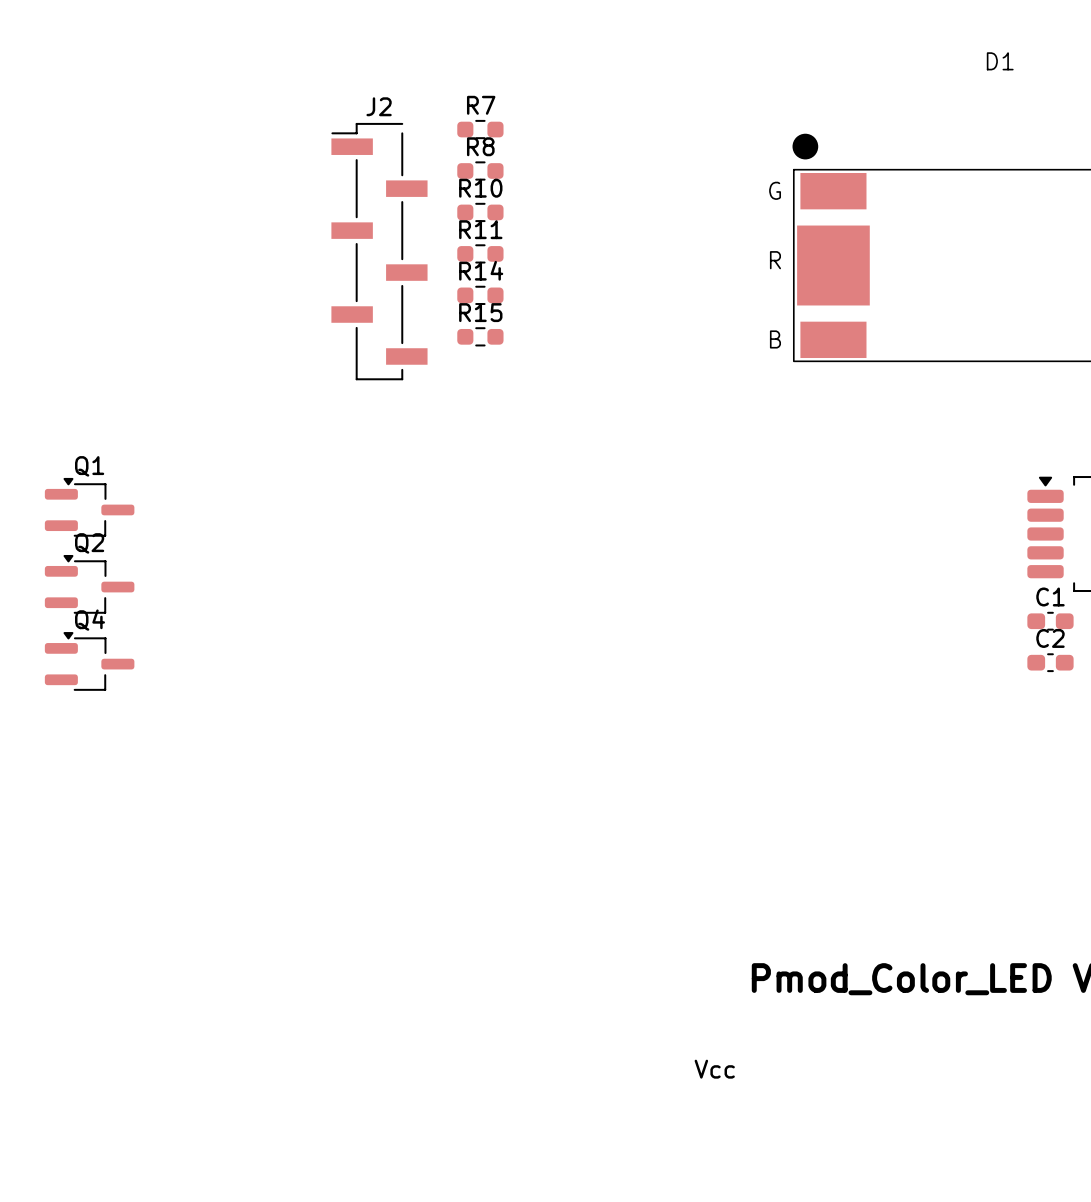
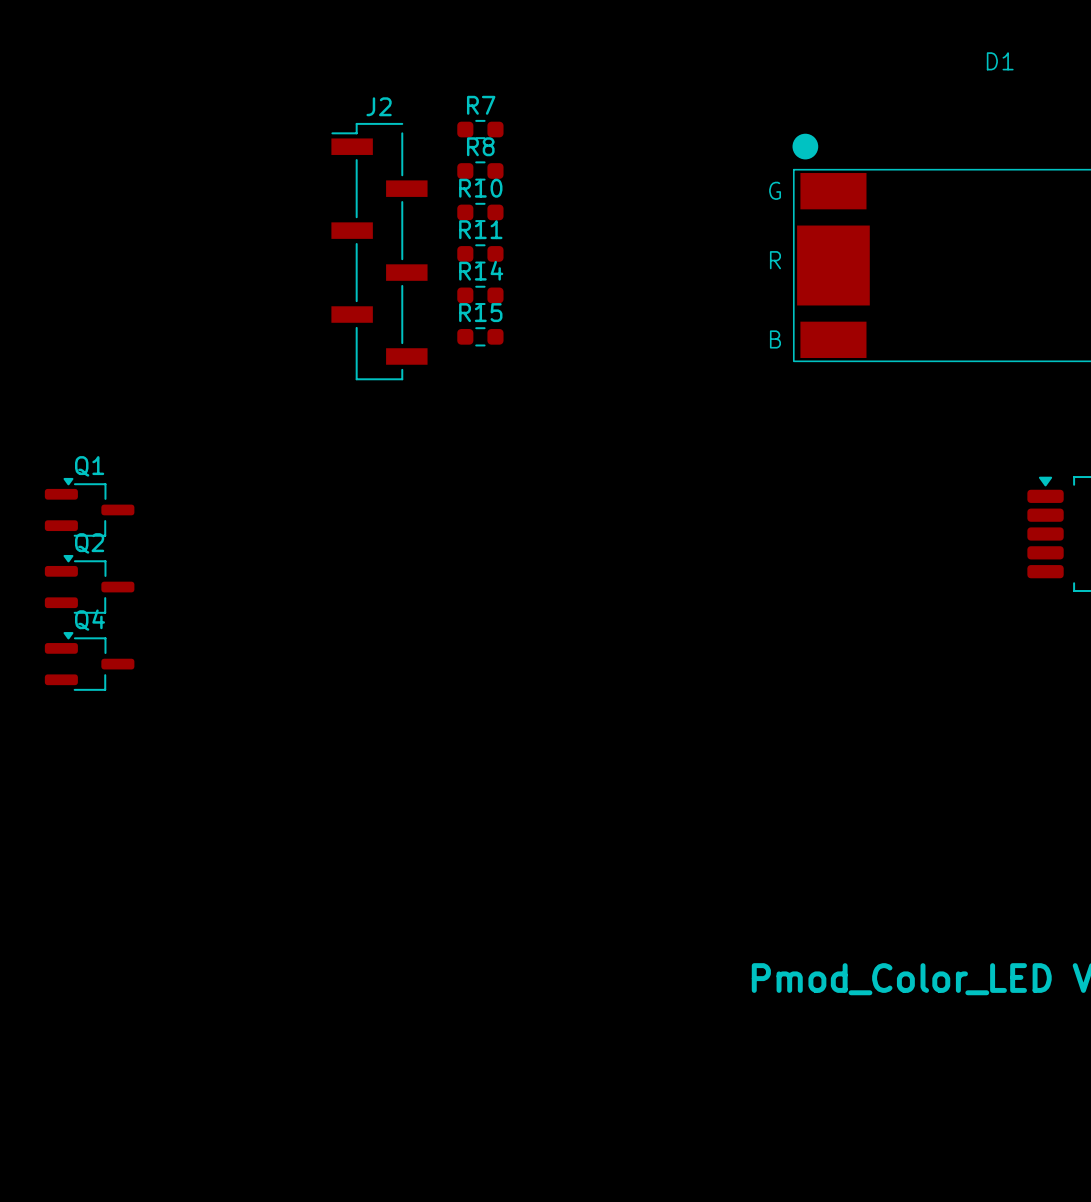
C1: (1050, 621) -> none
C2: (1050, 662) -> none
text: Vcc (714, 1069) -> none

